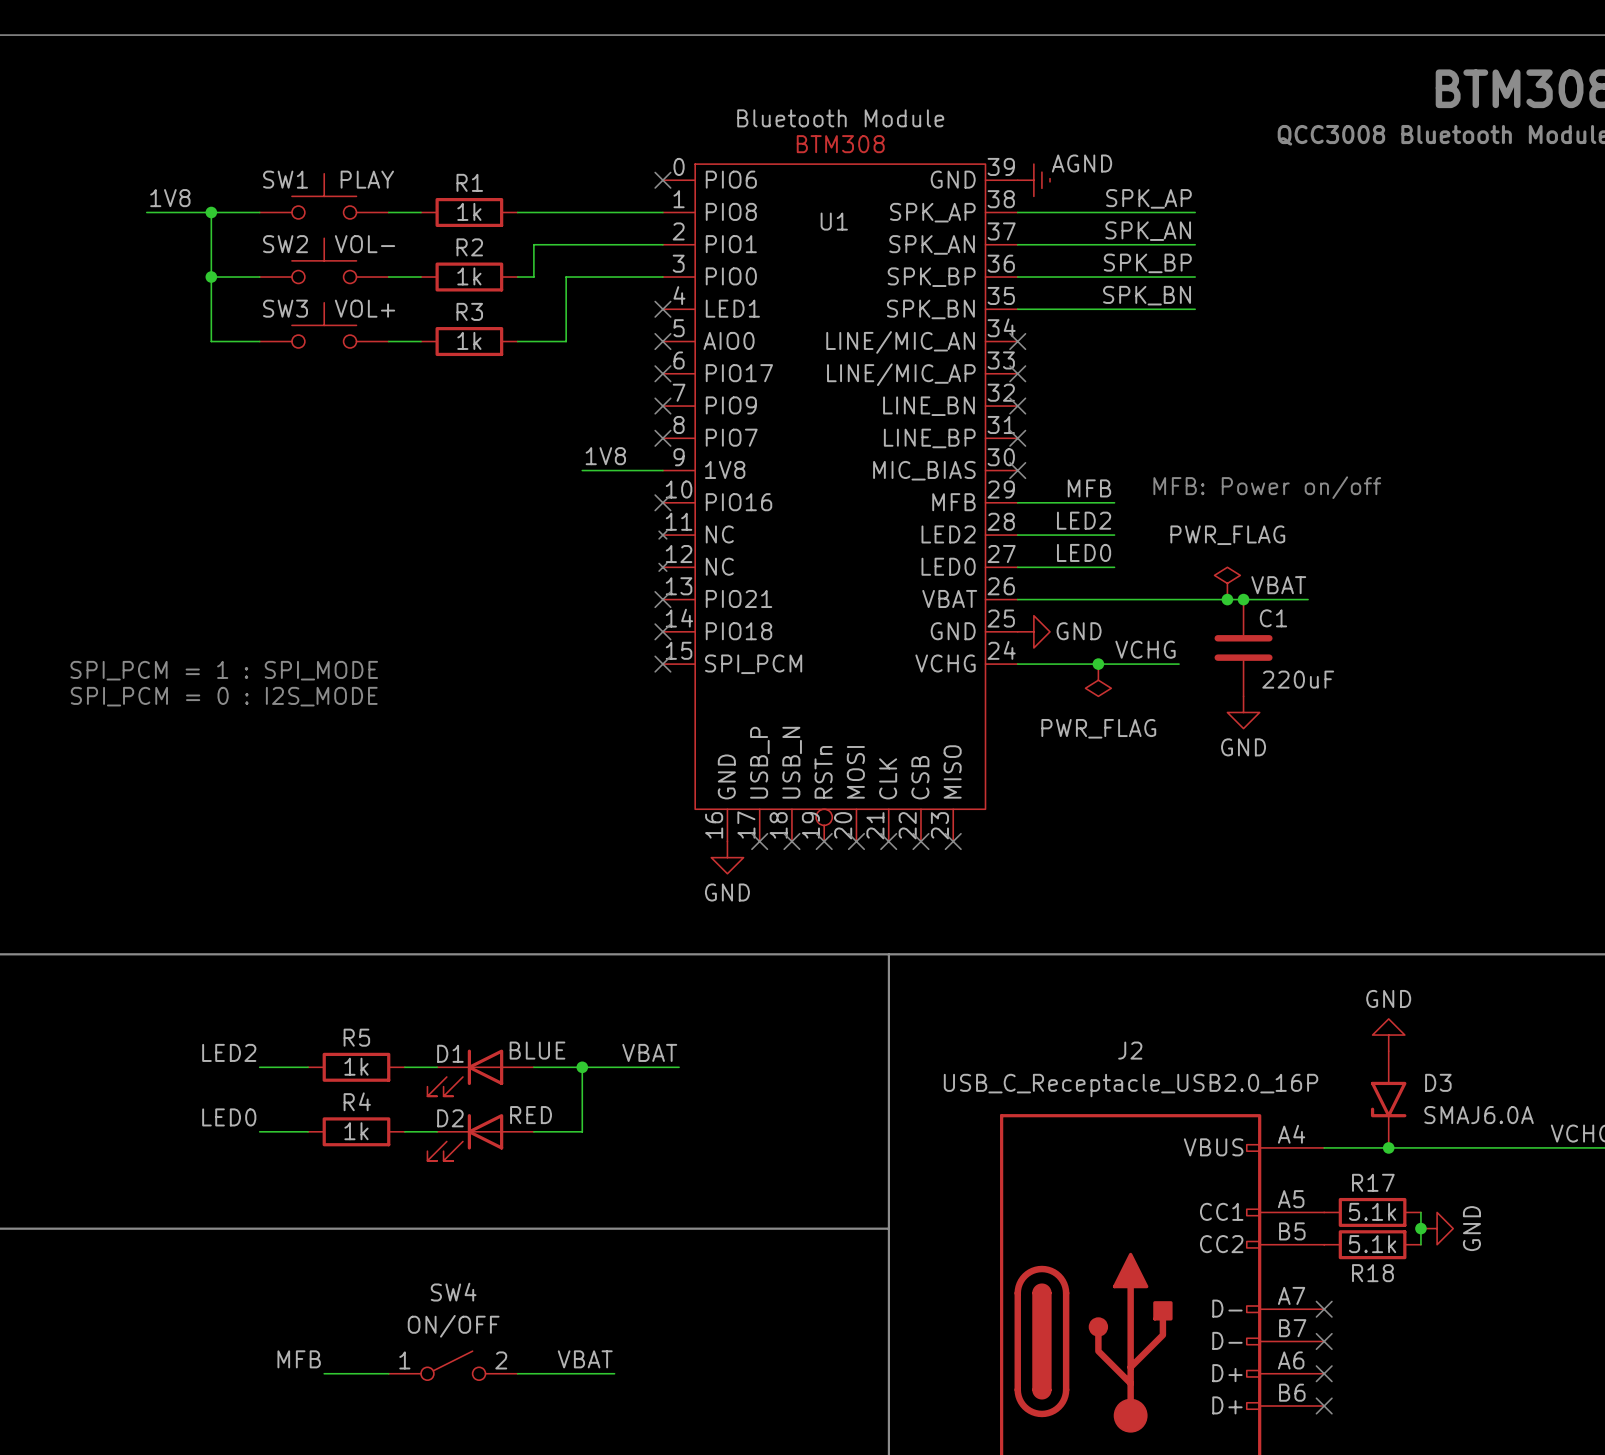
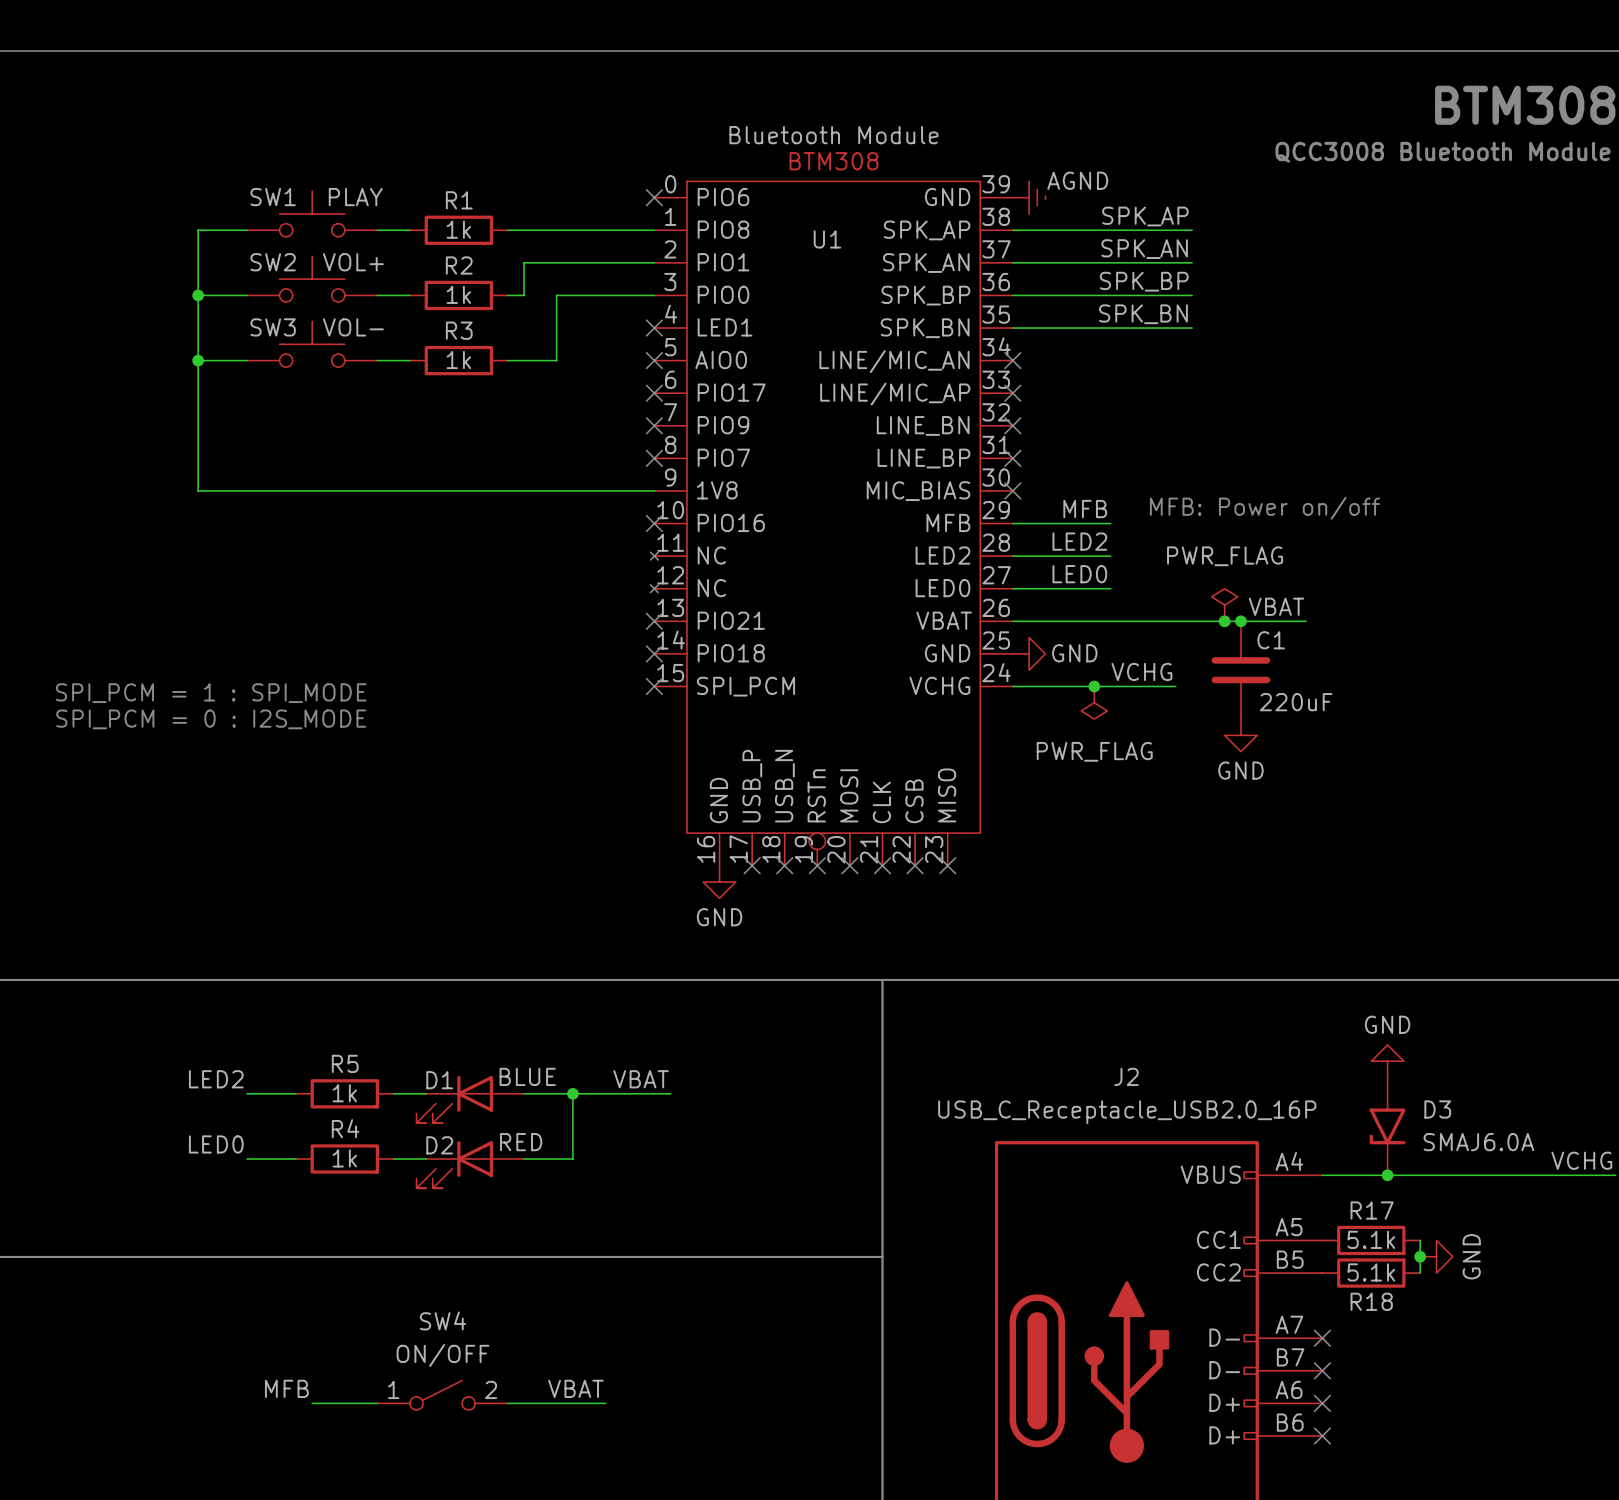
label: 1V8 (170, 198) -> none
wire: (146, 212) (211, 212) -> none
junction: (211, 212) -> none
SW2 value: VOL- (365, 244) -> VOL+ (353, 262)
SW3 value: VOL+ (365, 308) -> VOL- (353, 327)
wire: none -> (198, 360) (198, 490) (572, 490)
junction: none -> (198, 360)
label: 1V8 (605, 456) -> none

